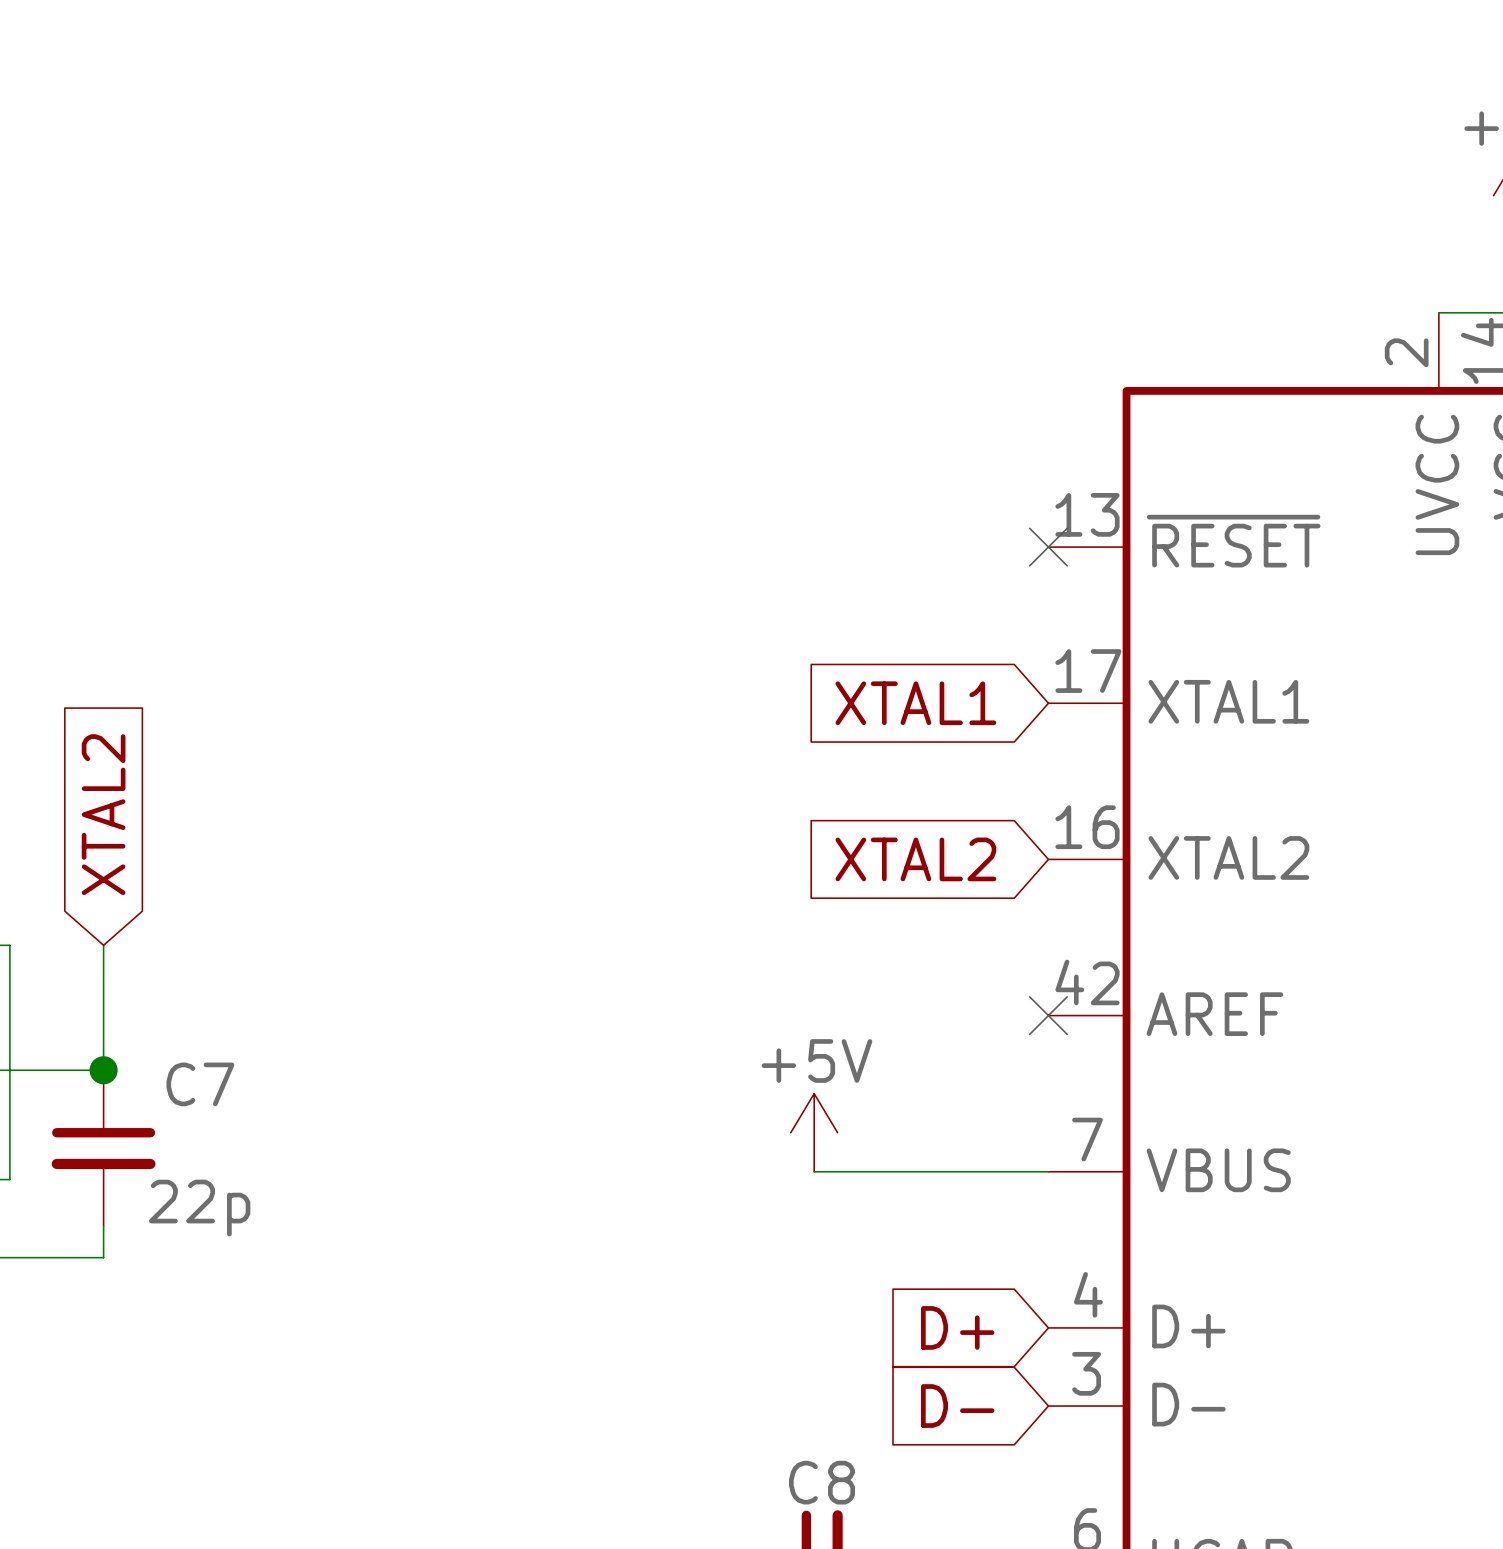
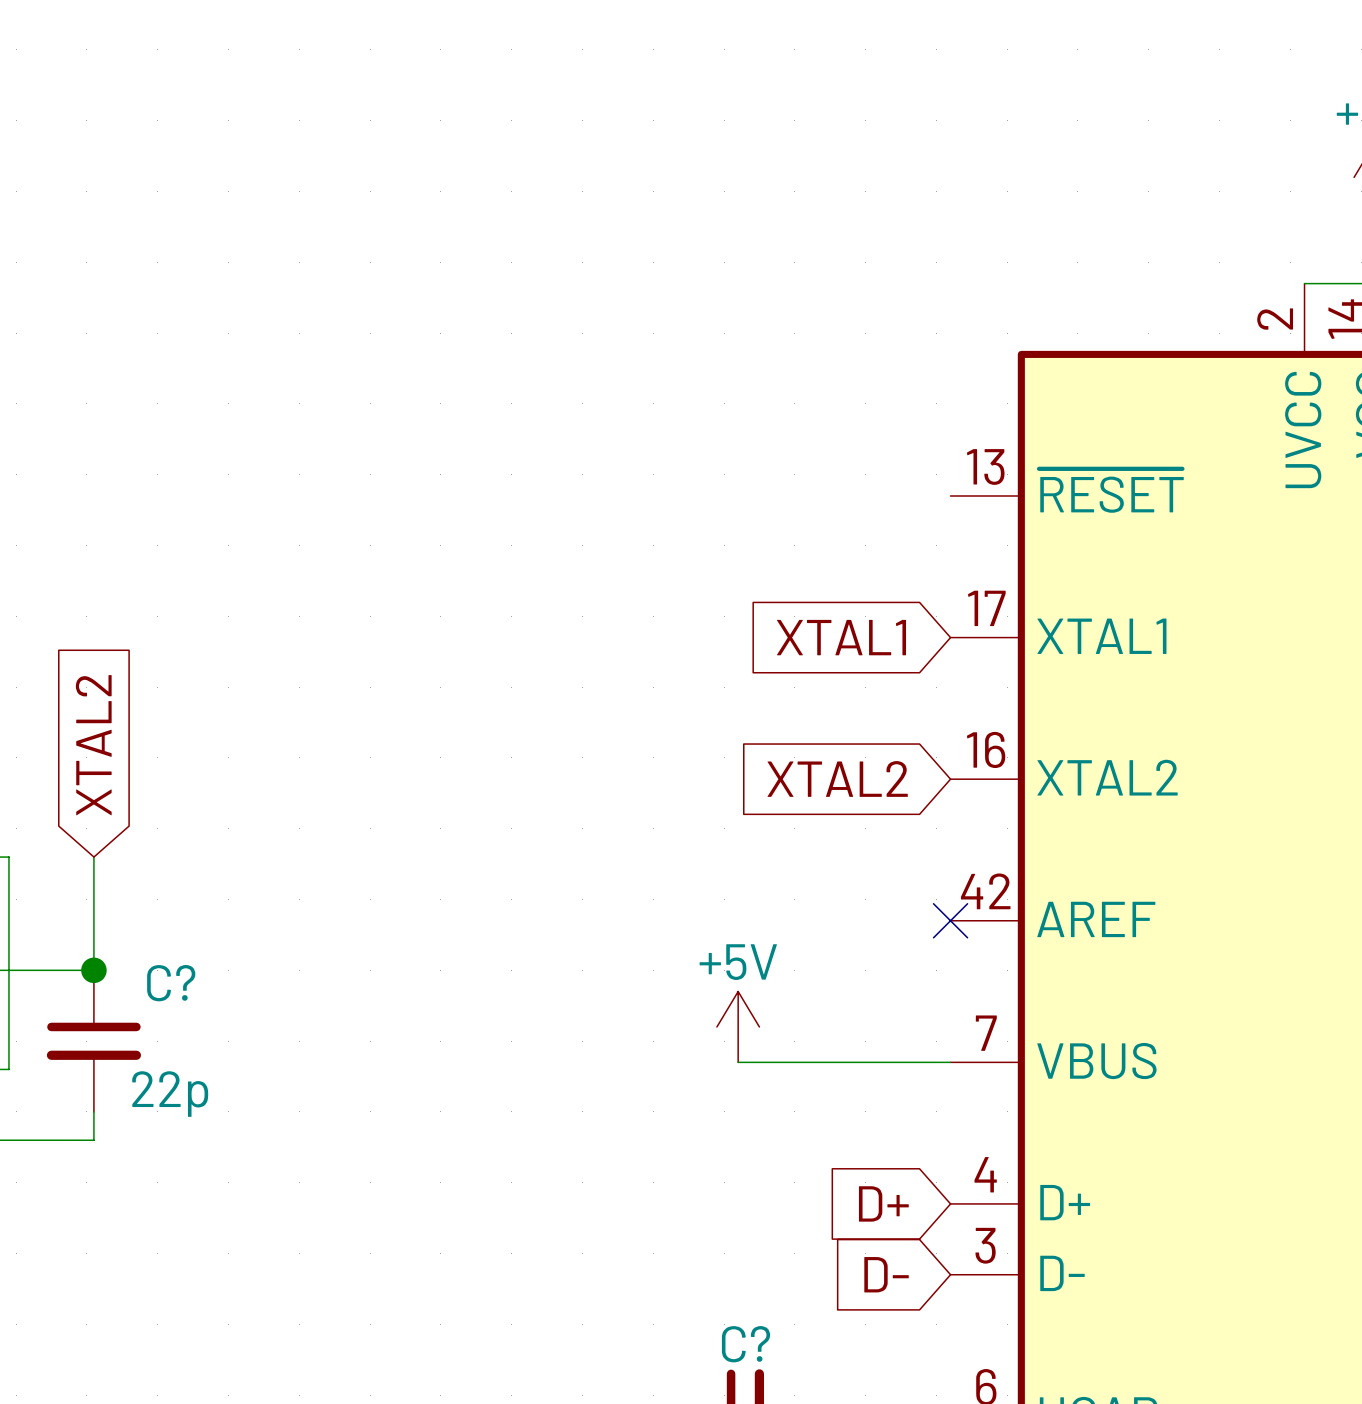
no-connect mark: (1048, 547) -> none
C7 name: C7 (200, 1084) -> C? (171, 983)
C8 name: C8 (821, 1482) -> C? (745, 1344)

